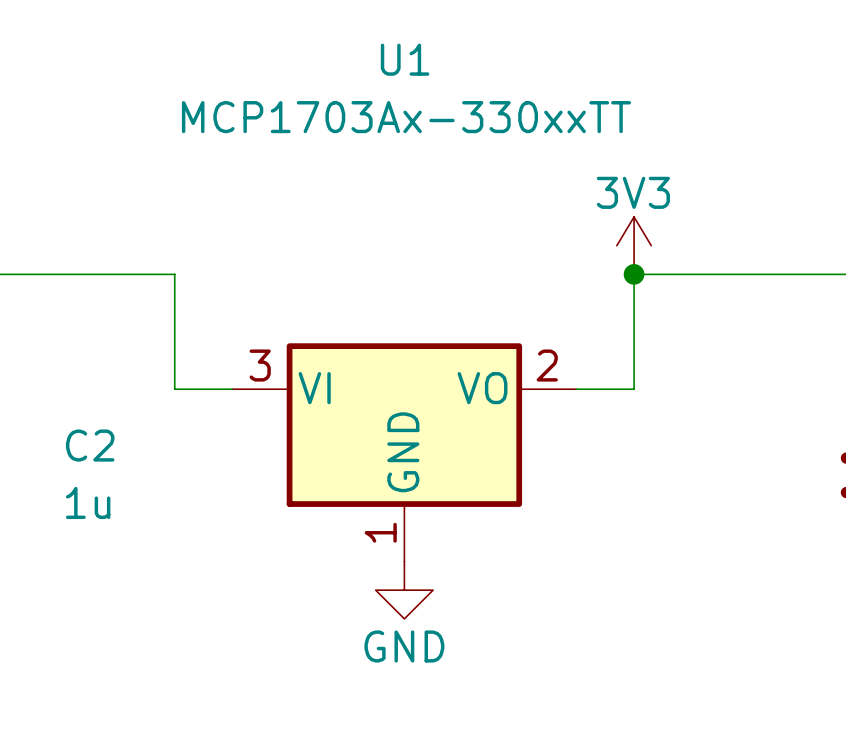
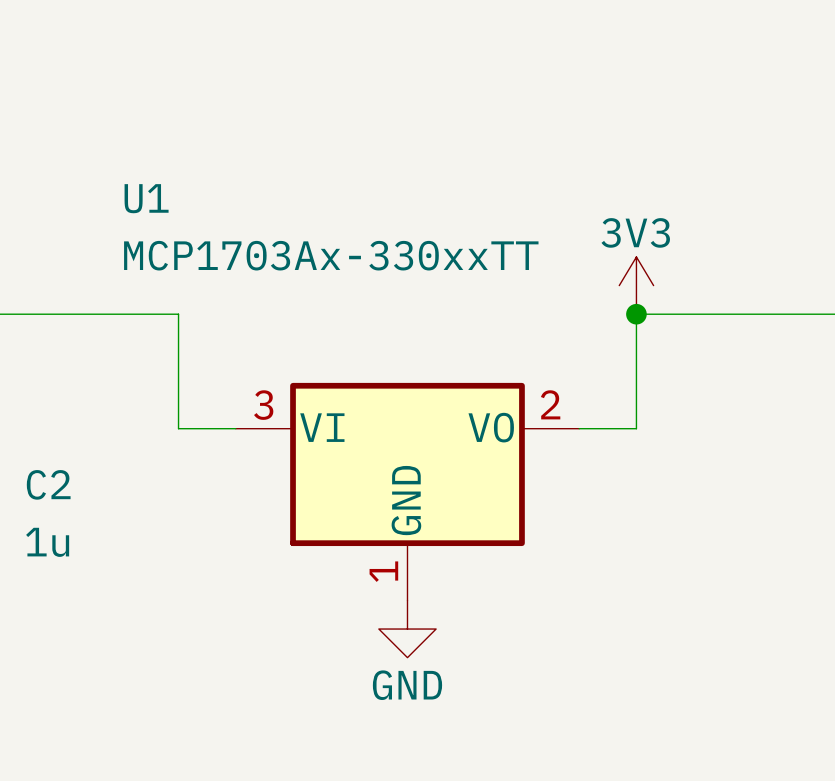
U1 name position: U1 (405, 59) -> U1 (146, 198)
U1 value position: MCP1703Ax-330xxTT (406, 117) -> MCP1703Ax-330xxTT (331, 255)
C2 name position: C2 (90, 445) -> C2 (48, 484)
C2 value position: 1u (88, 502) -> 1u (47, 542)

